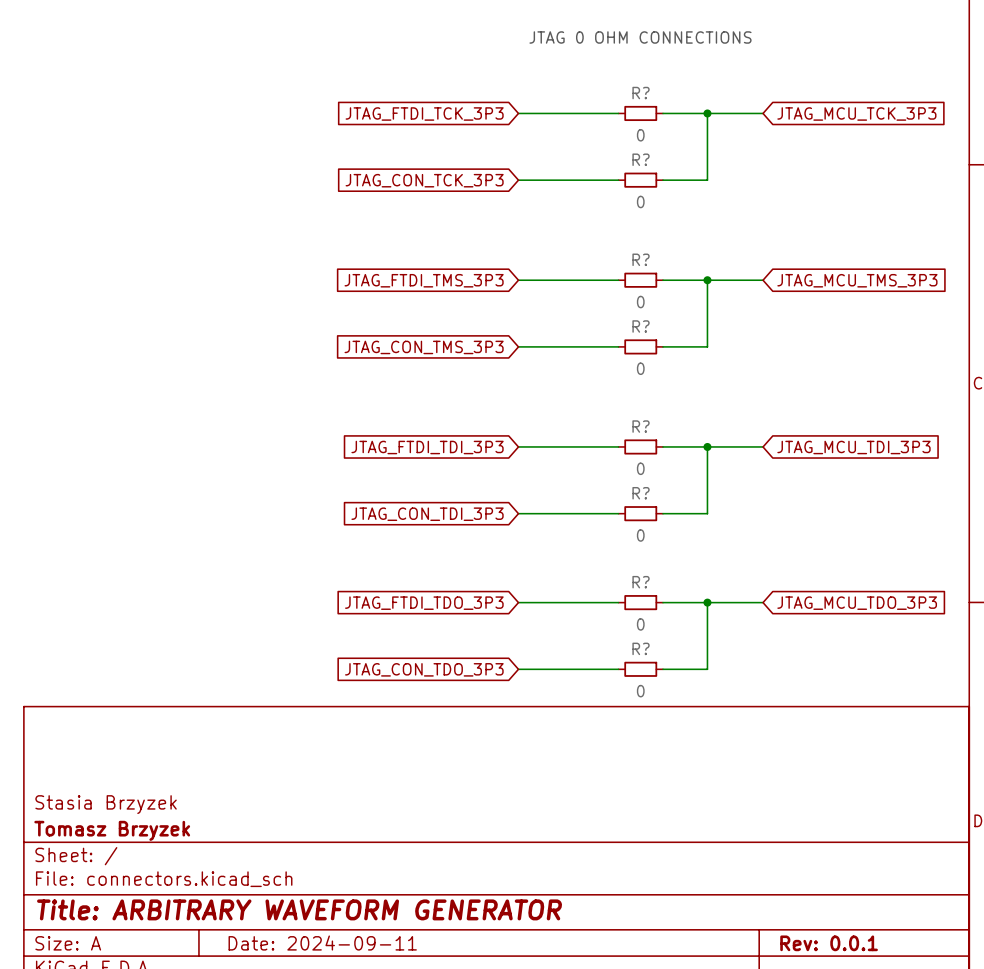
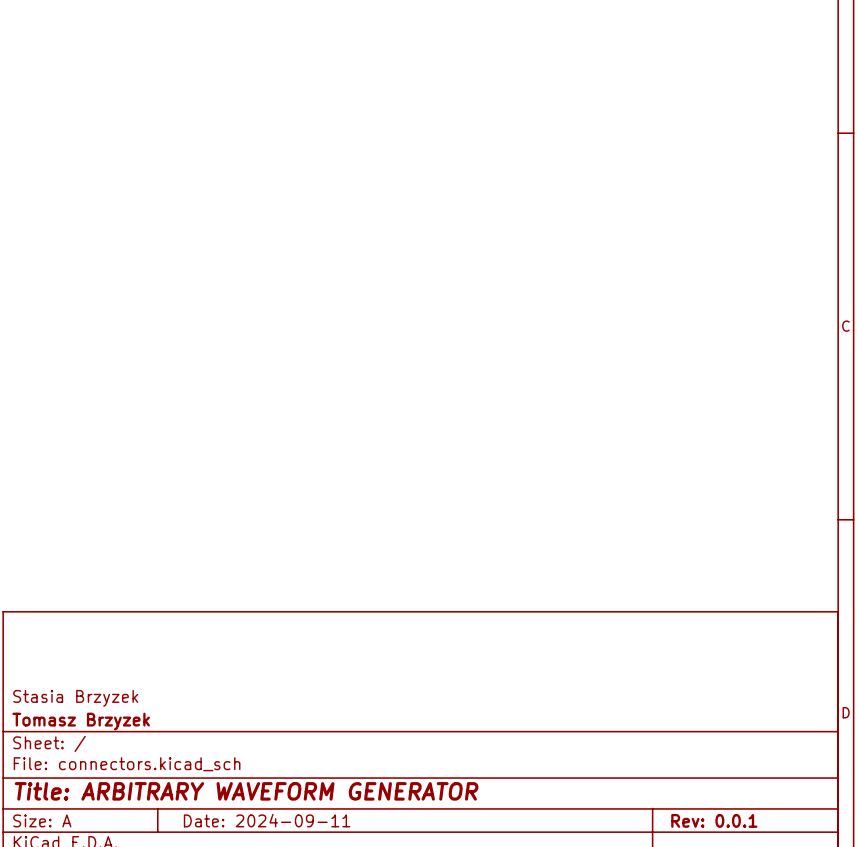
text: JTAG 0 OHM CONNECTIONS (640, 37) -> none
global label: JTAG_FTDI_TCK_3P3 (424, 113) -> none
wire: (518, 113) (618, 113) -> none
R?: 0 (640, 113) -> none
wire: (662, 113) (763, 113) -> none
wire: (707, 113) (707, 180) (662, 180) -> none
junction: (707, 113) -> none
global label: JTAG_MCU_TCK_3P3 (856, 113) -> none
global label: JTAG_CON_TCK_3P3 (424, 180) -> none
wire: (518, 180) (618, 180) -> none
R?: 0 (640, 180) -> none
global label: JTAG_FTDI_TMS_3P3 (424, 280) -> none
wire: (518, 280) (618, 280) -> none
R?: 0 (640, 280) -> none
wire: (662, 280) (763, 280) -> none
wire: (707, 280) (707, 346) (662, 346) -> none
junction: (707, 280) -> none
global label: JTAG_MCU_TMS_3P3 (857, 280) -> none
wire: (518, 346) (618, 346) -> none
R?: 0 (640, 346) -> none
global label: JTAG_CON_TMS_3P3 (424, 347) -> none
wire: (518, 446) (618, 446) -> none
R?: 0 (640, 446) -> none
wire: (662, 446) (763, 446) -> none
wire: (707, 446) (707, 513) (662, 513) -> none
junction: (707, 446) -> none
global label: JTAG_FTDI_TDI_3P3 (427, 447) -> none
global label: JTAG_MCU_TDI_3P3 (853, 447) -> none
wire: (518, 513) (618, 513) -> none
R?: 0 (640, 513) -> none
global label: JTAG_CON_TDI_3P3 (427, 514) -> none
wire: (518, 602) (618, 602) -> none
R?: 0 (640, 602) -> none
wire: (662, 602) (763, 602) -> none
wire: (707, 602) (707, 669) (662, 669) -> none
junction: (707, 602) -> none
global label: JTAG_FTDI_TDO_3P3 (424, 603) -> none
global label: JTAG_MCU_TDO_3P3 (857, 603) -> none
global label: JTAG_CON_TDO_3P3 (424, 669) -> none
wire: (518, 669) (618, 669) -> none
R?: 0 (640, 669) -> none

